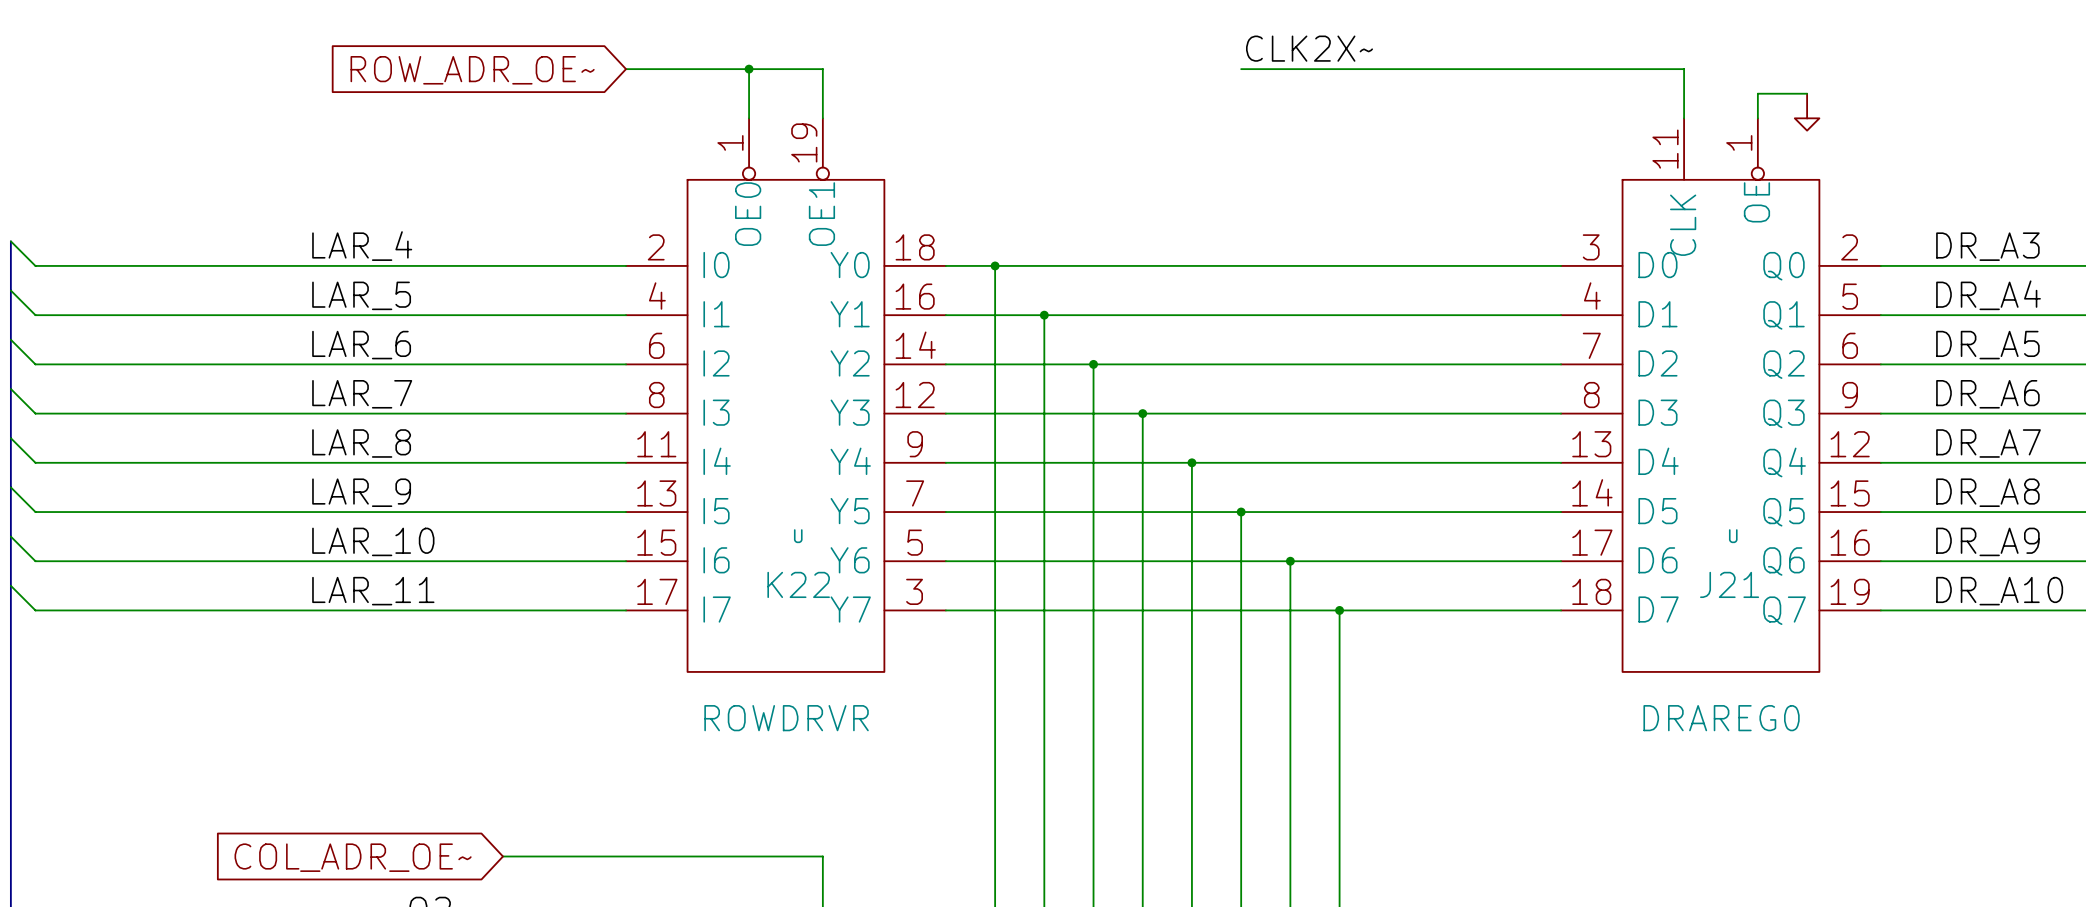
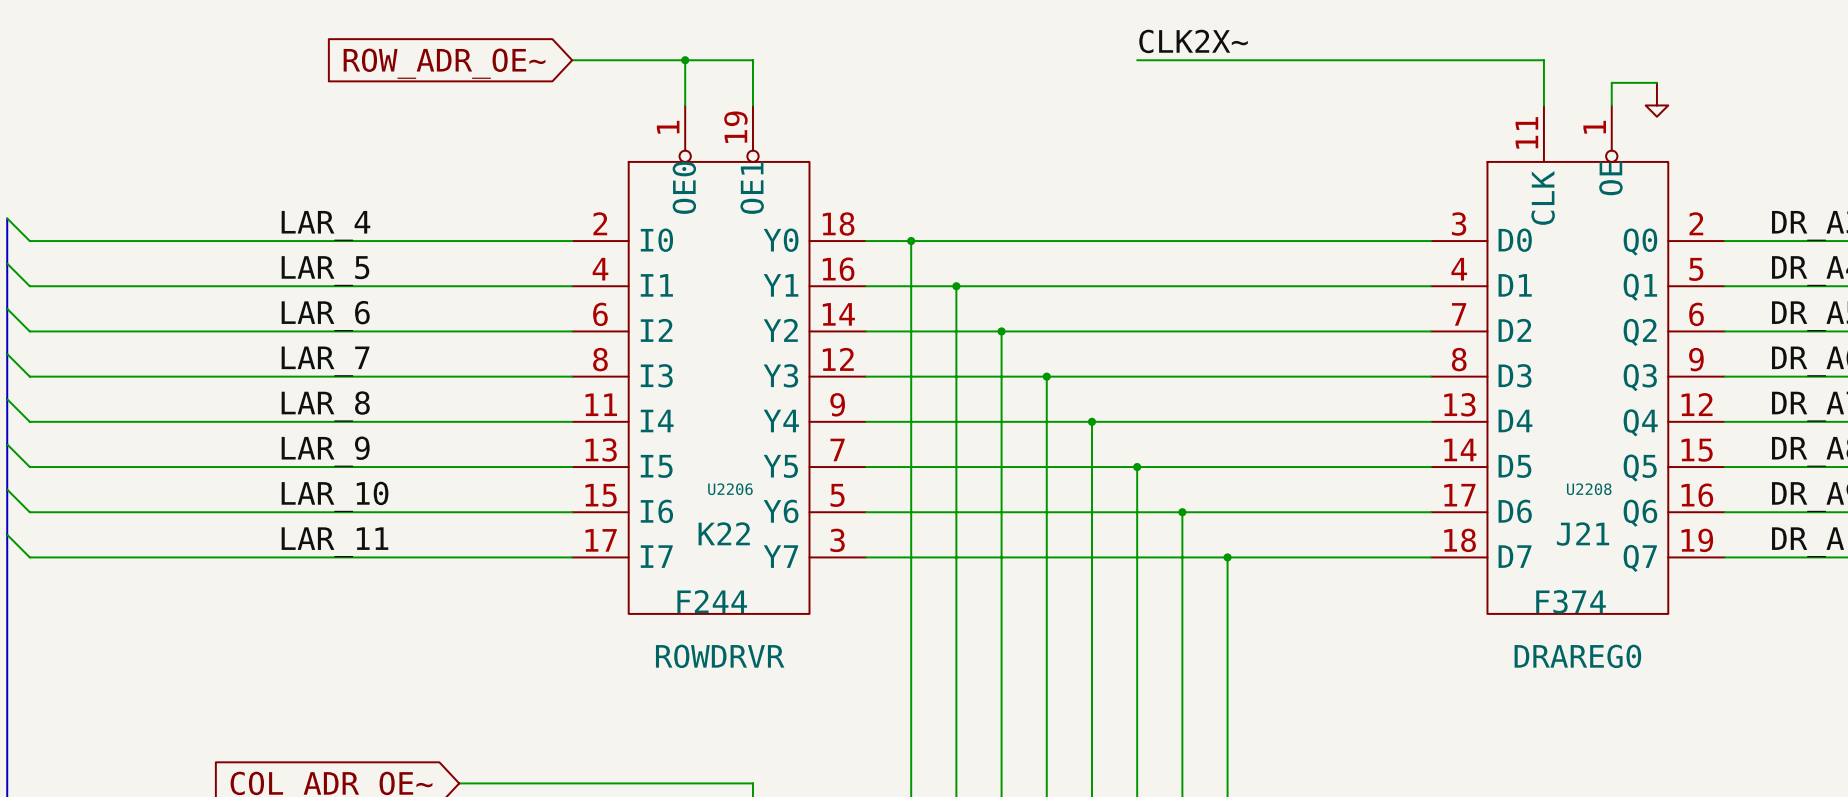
U name: U (798, 536) -> U2206 (730, 489)
U name: U (1733, 536) -> U2208 (1589, 489)
U value: none -> F244 (712, 601)
U value: none -> F374 (1571, 601)

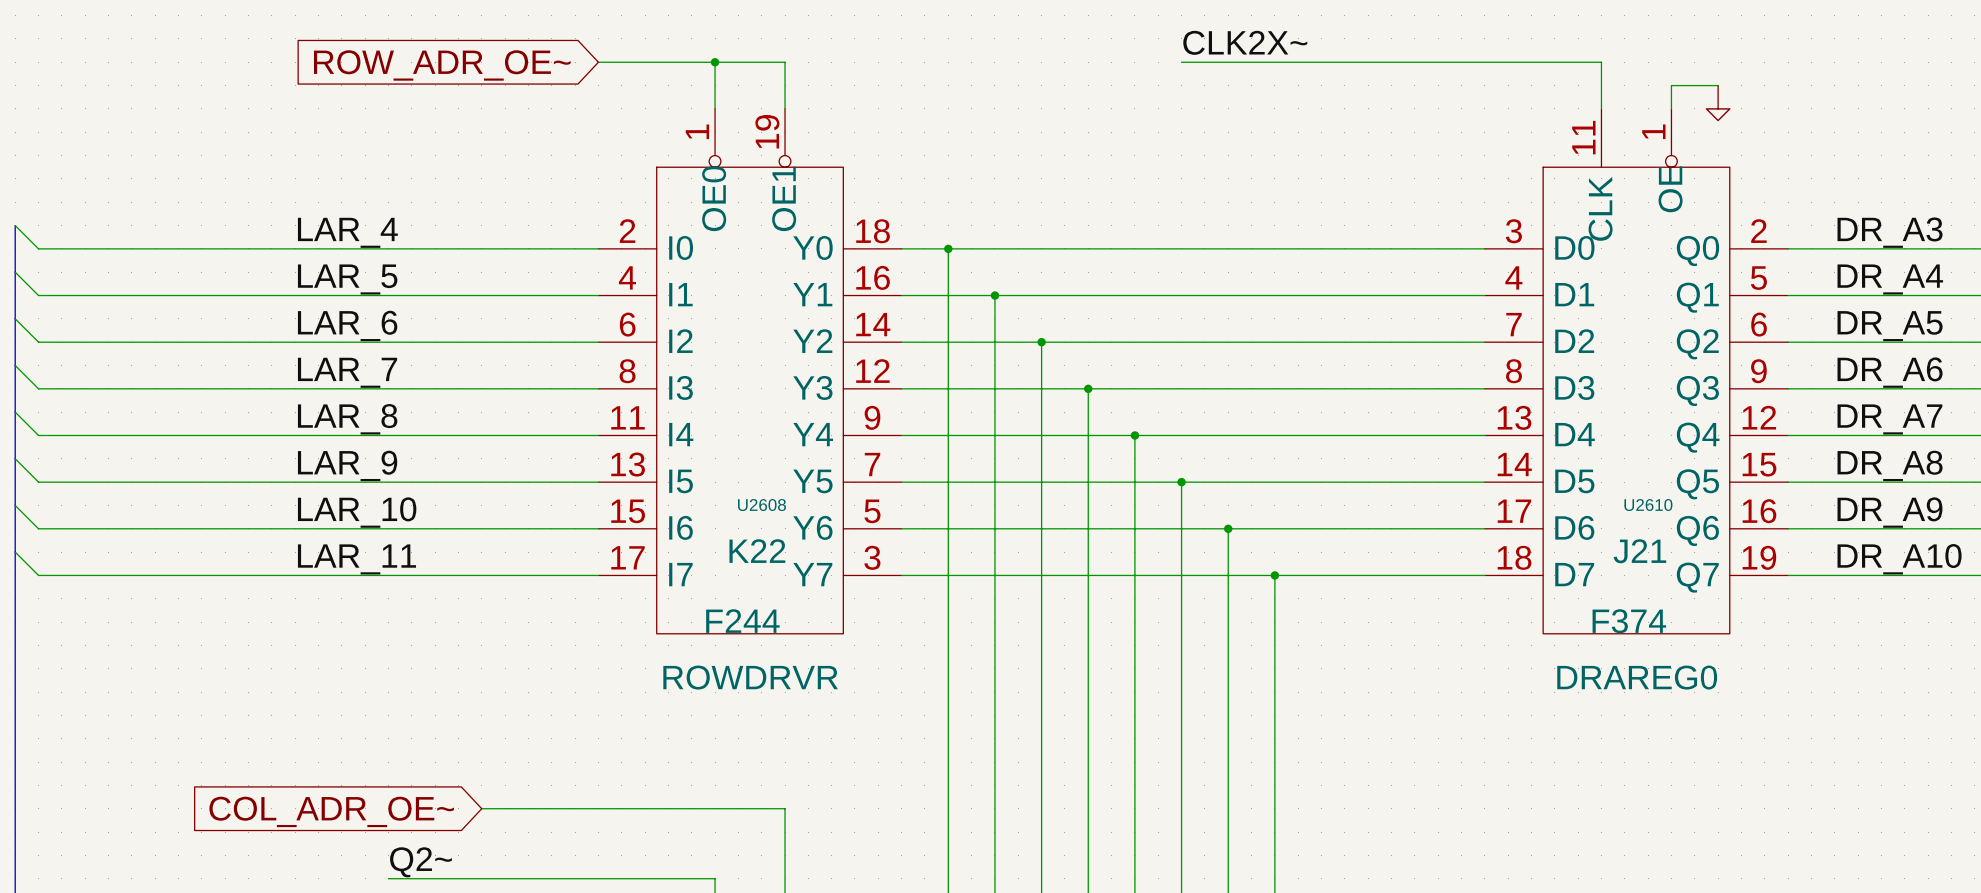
U2206 name: U2206 (730, 489) -> U2608 (761, 505)
U2208 name: U2208 (1589, 489) -> U2610 (1648, 505)

